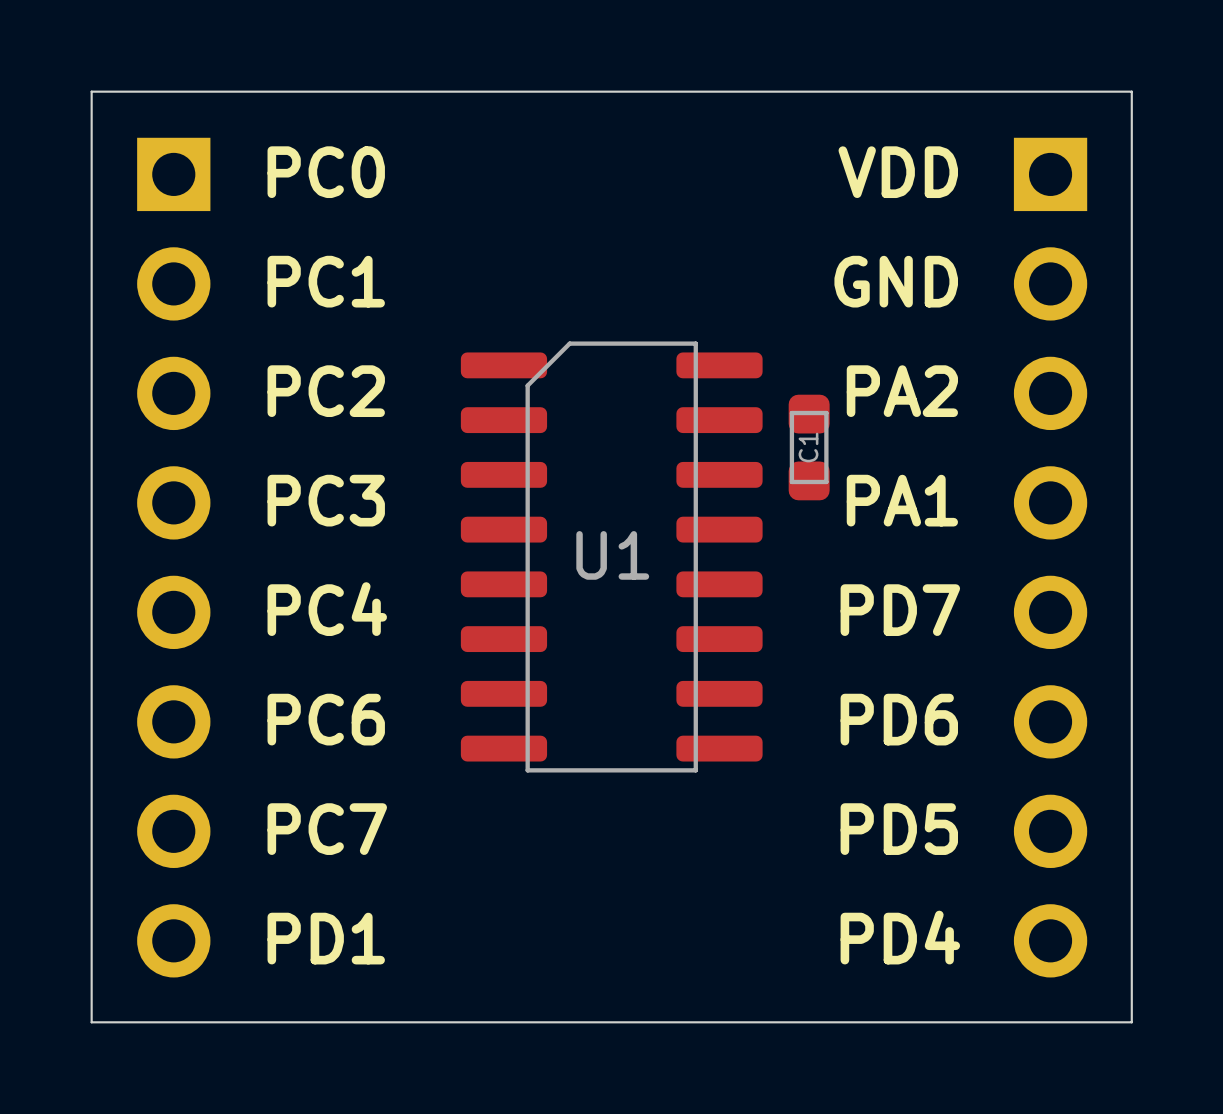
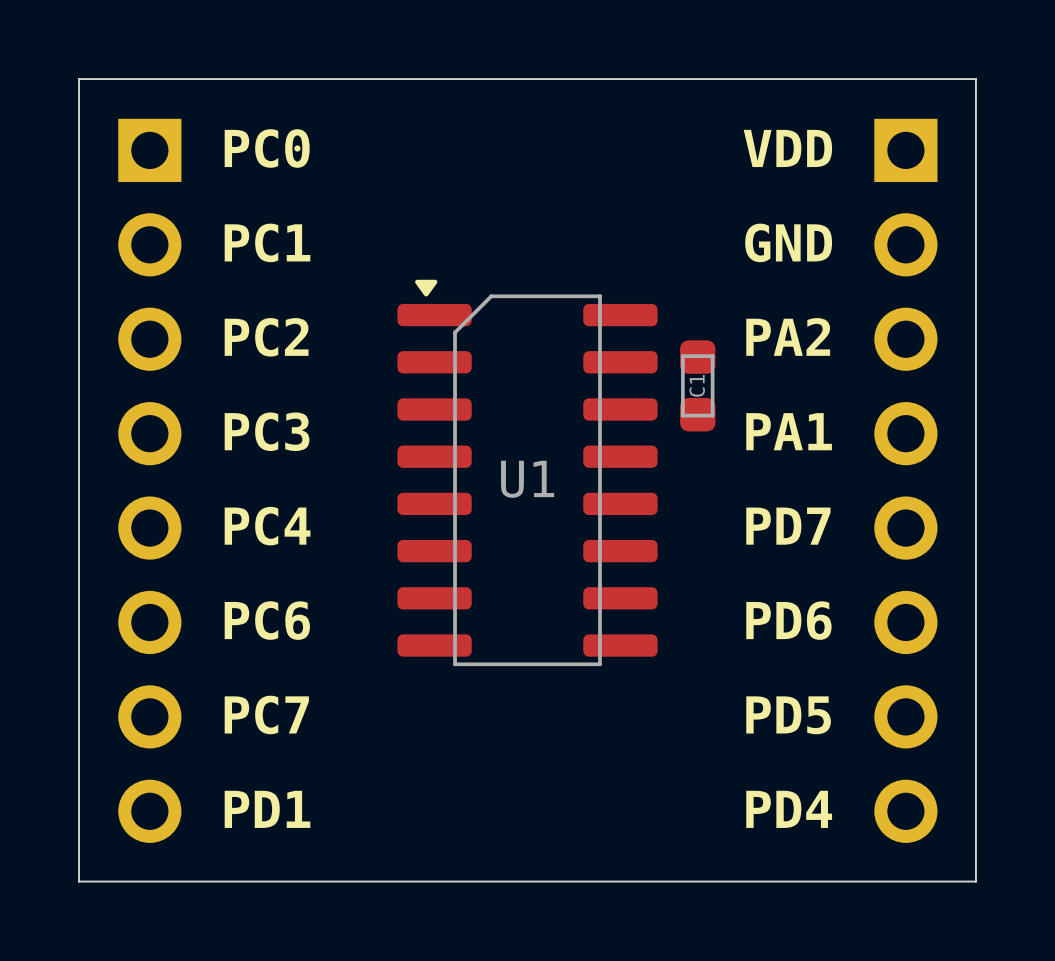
U1 footprint: [460, 341, 763, 773] -> [397, 279, 658, 667]

